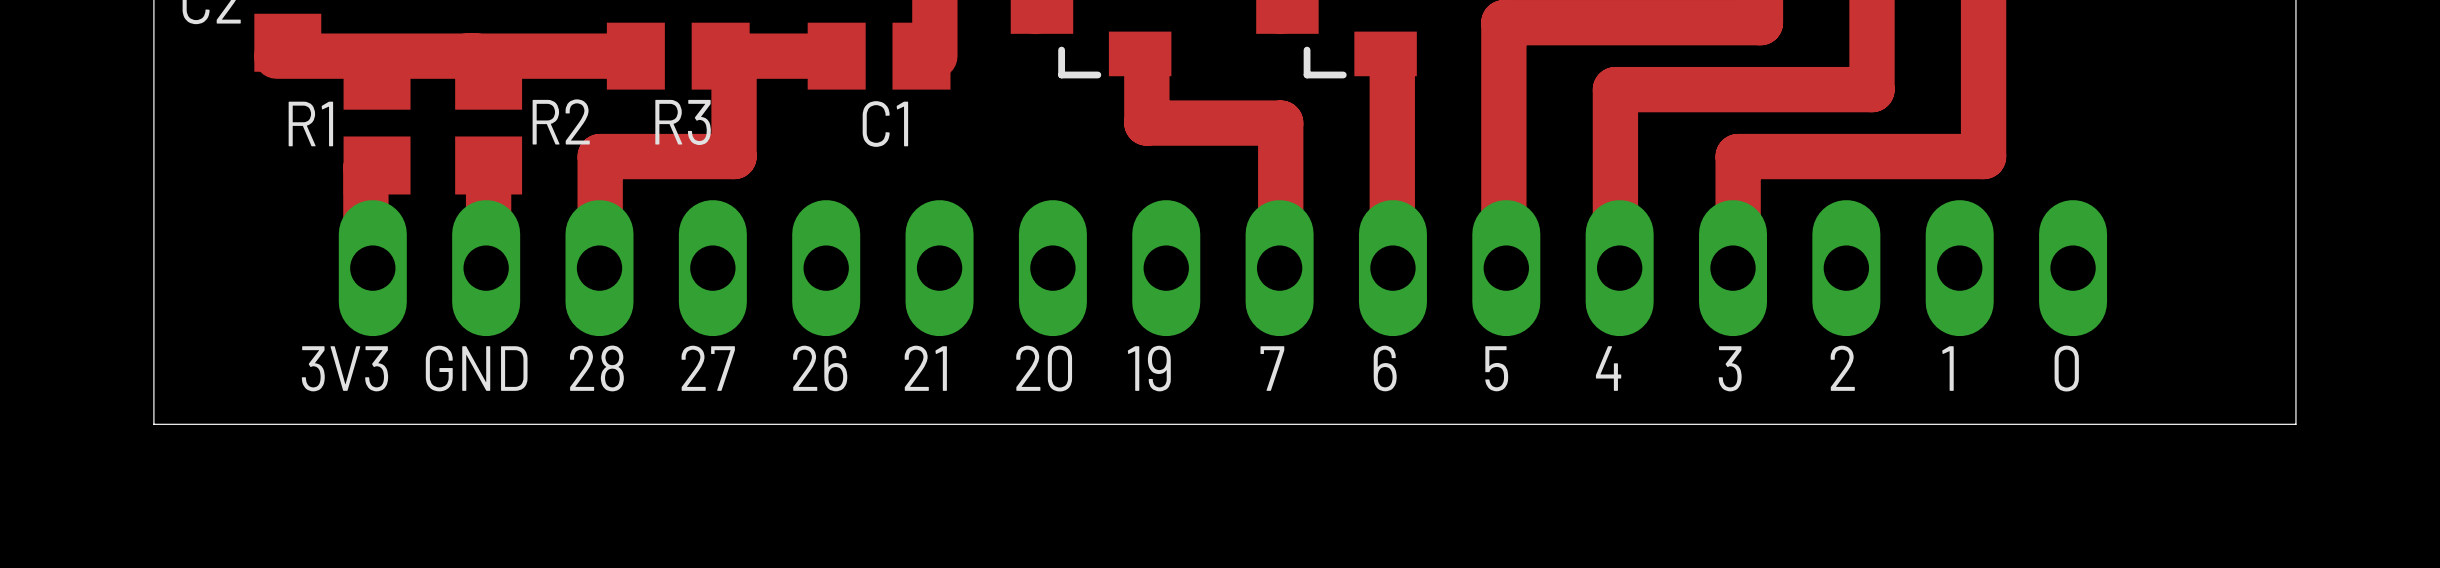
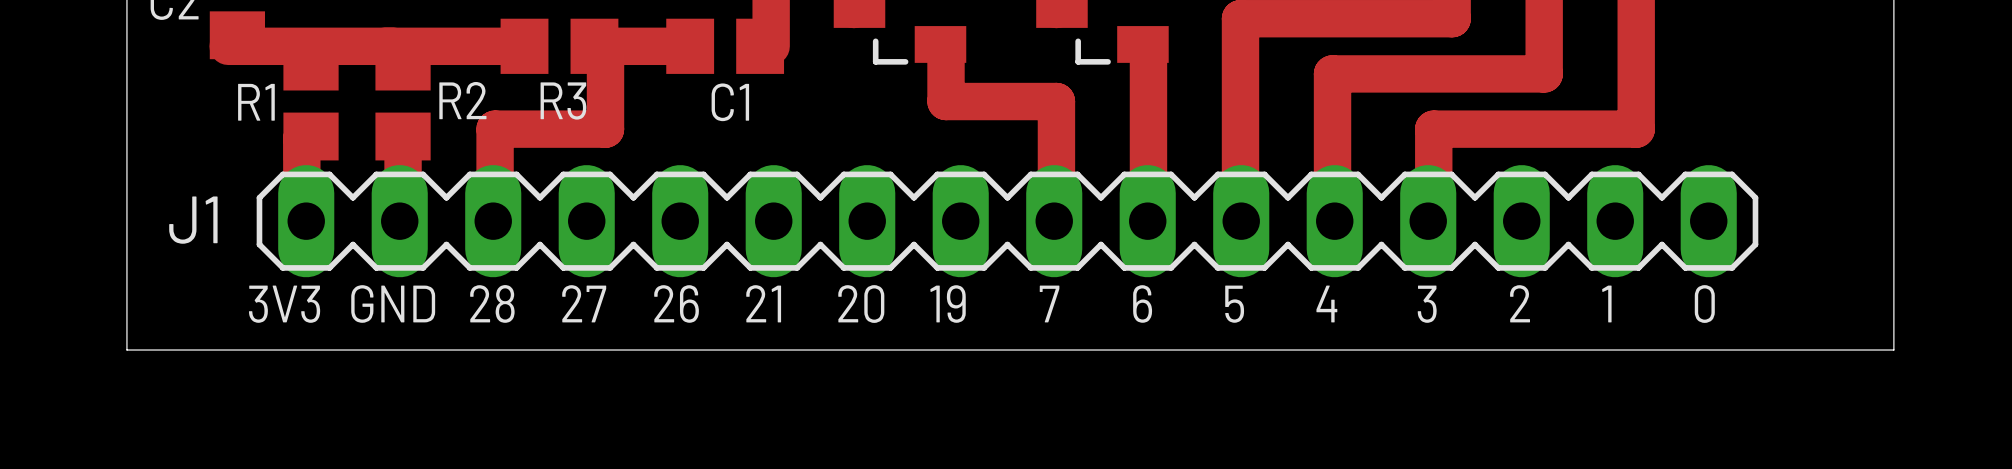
J1 side: bottom (1222, 268) -> top (1007, 221)

